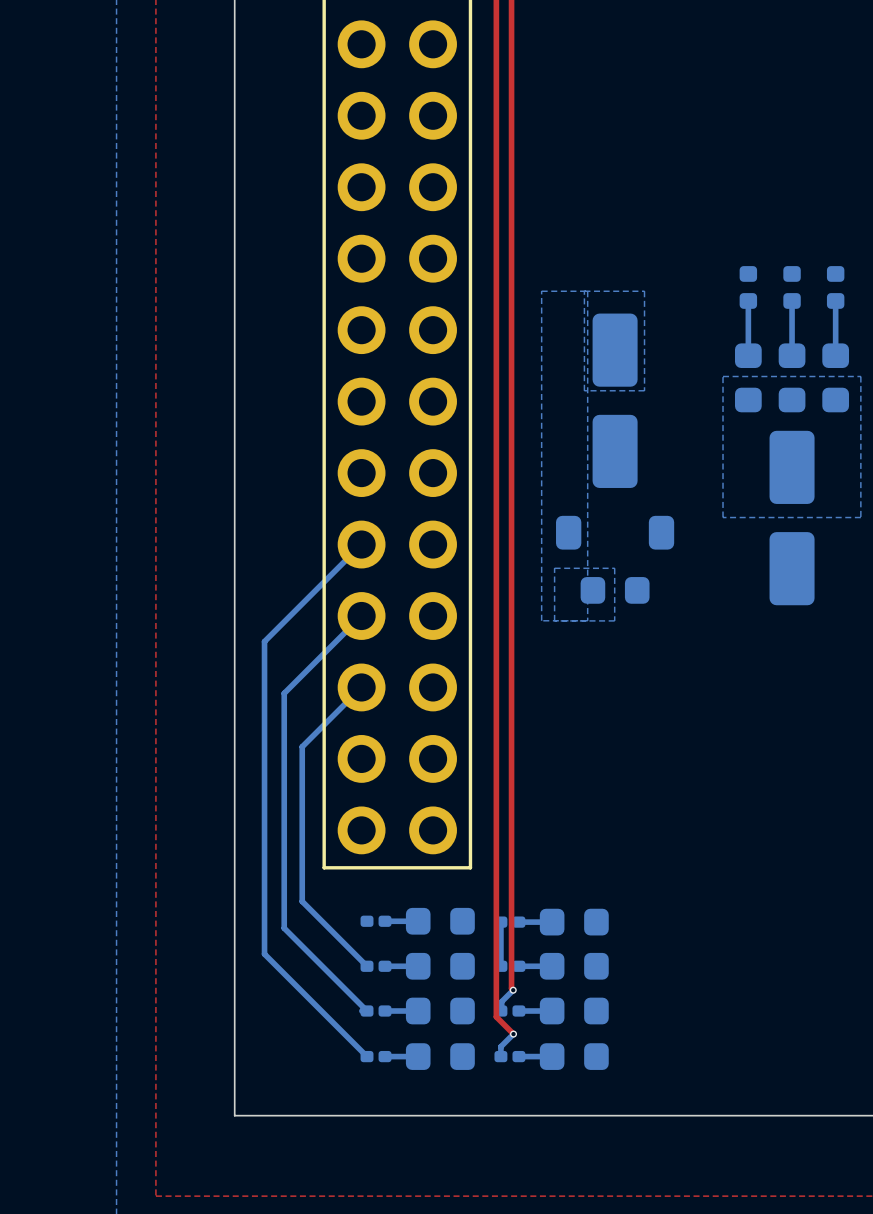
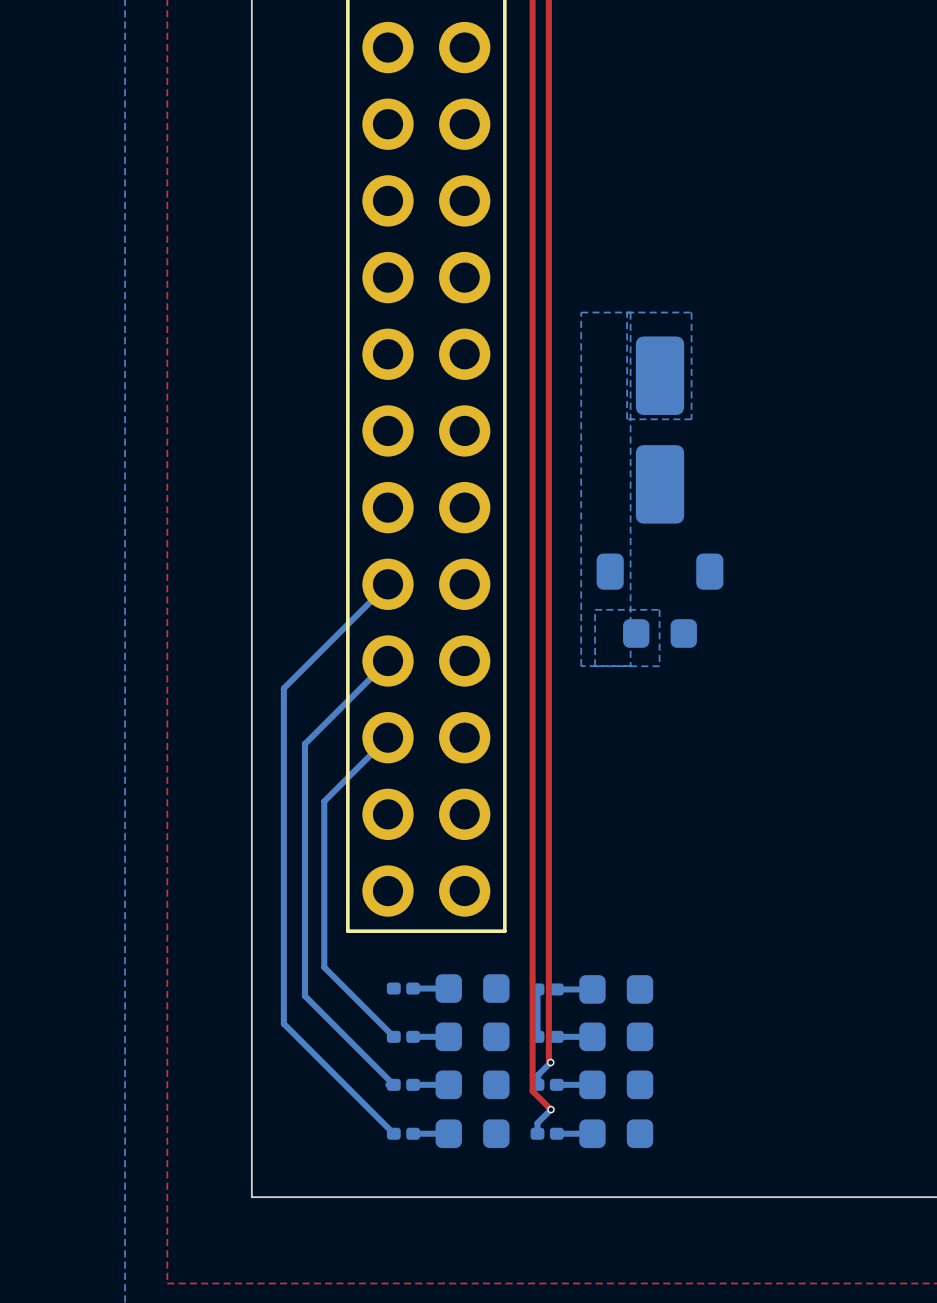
part: (748, 287) -> none
part: (792, 287) -> none
part: (835, 287) -> none
bottom track: (748, 300) (748, 355) -> none
bottom track: (792, 300) (792, 355) -> none
bottom track: (835, 300) (835, 355) -> none
bottom zone outline: (723, 376) (860, 376) (860, 517) (723, 517) (723, 376) -> none
part: (748, 377) -> none
part: (792, 377) -> none
part: (835, 377) -> none
part: (792, 518) -> none

